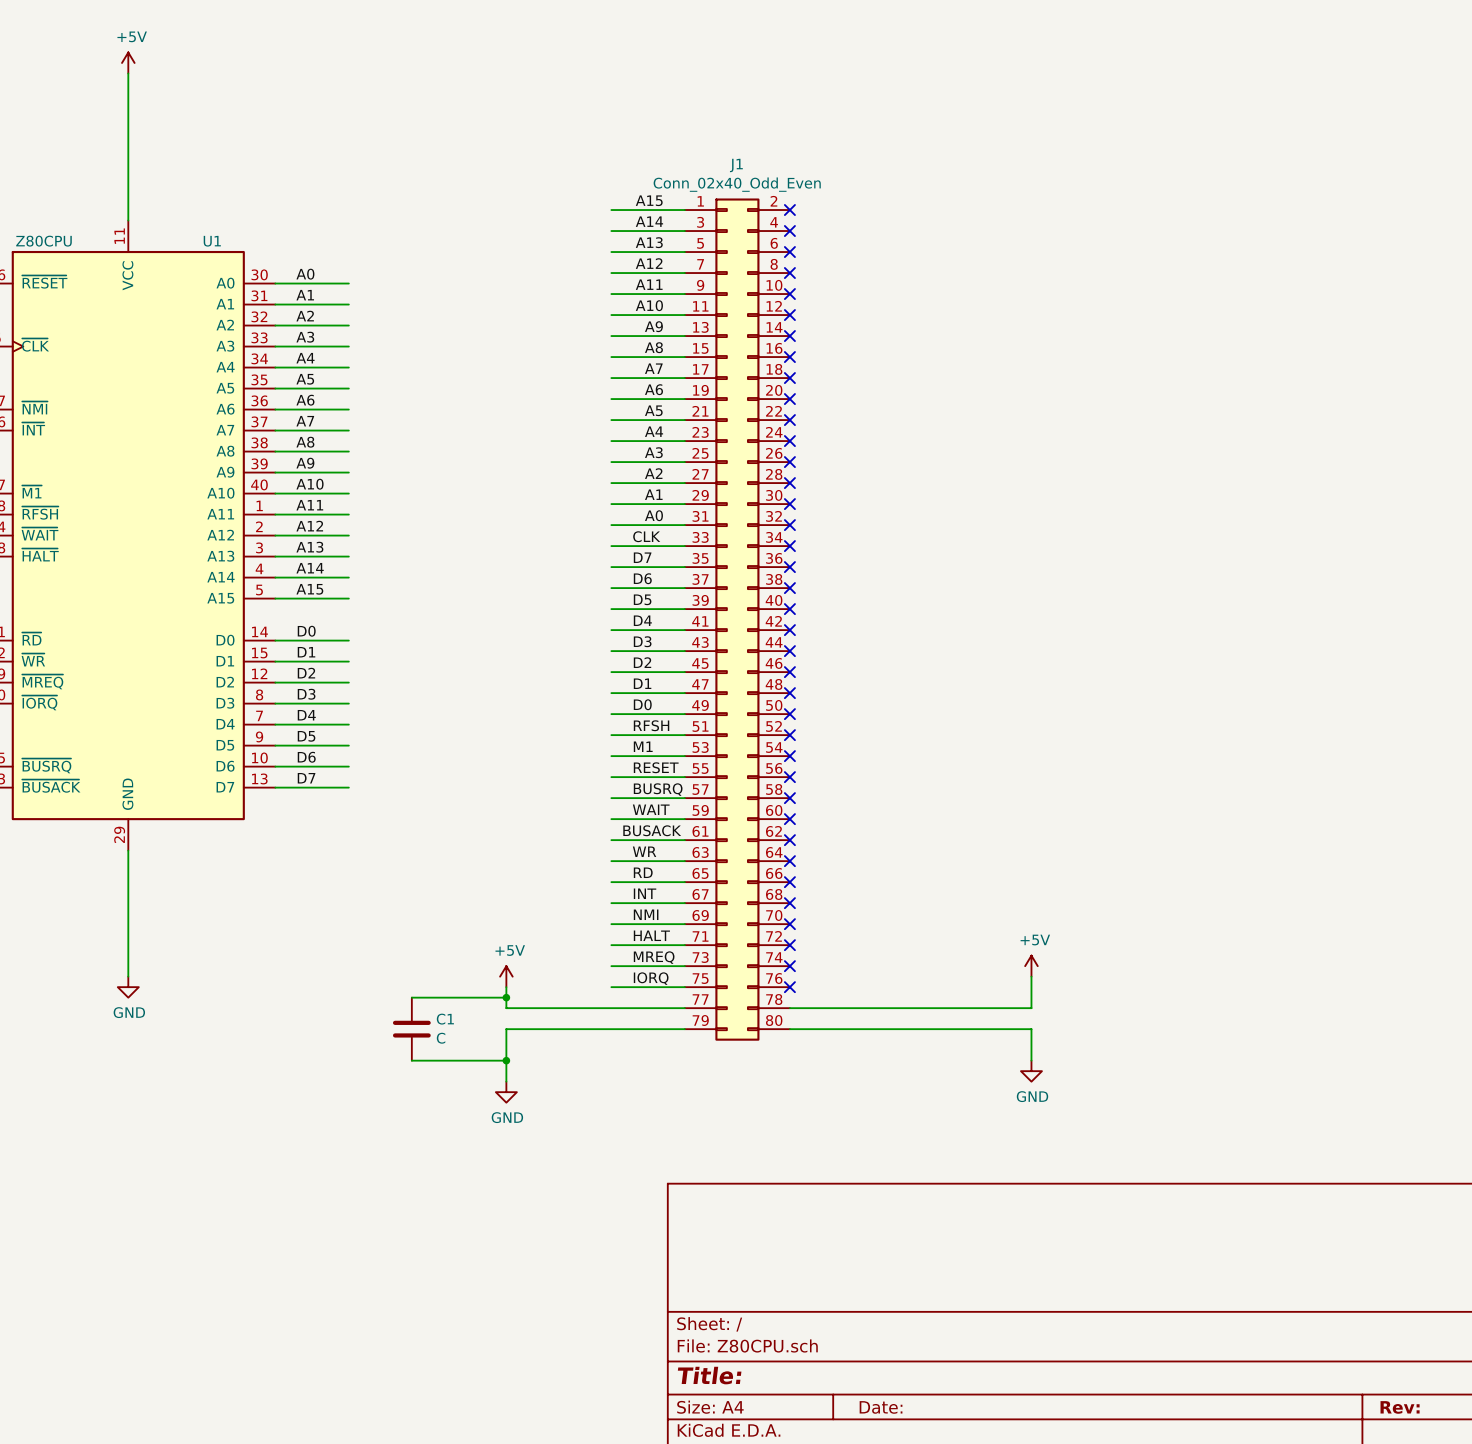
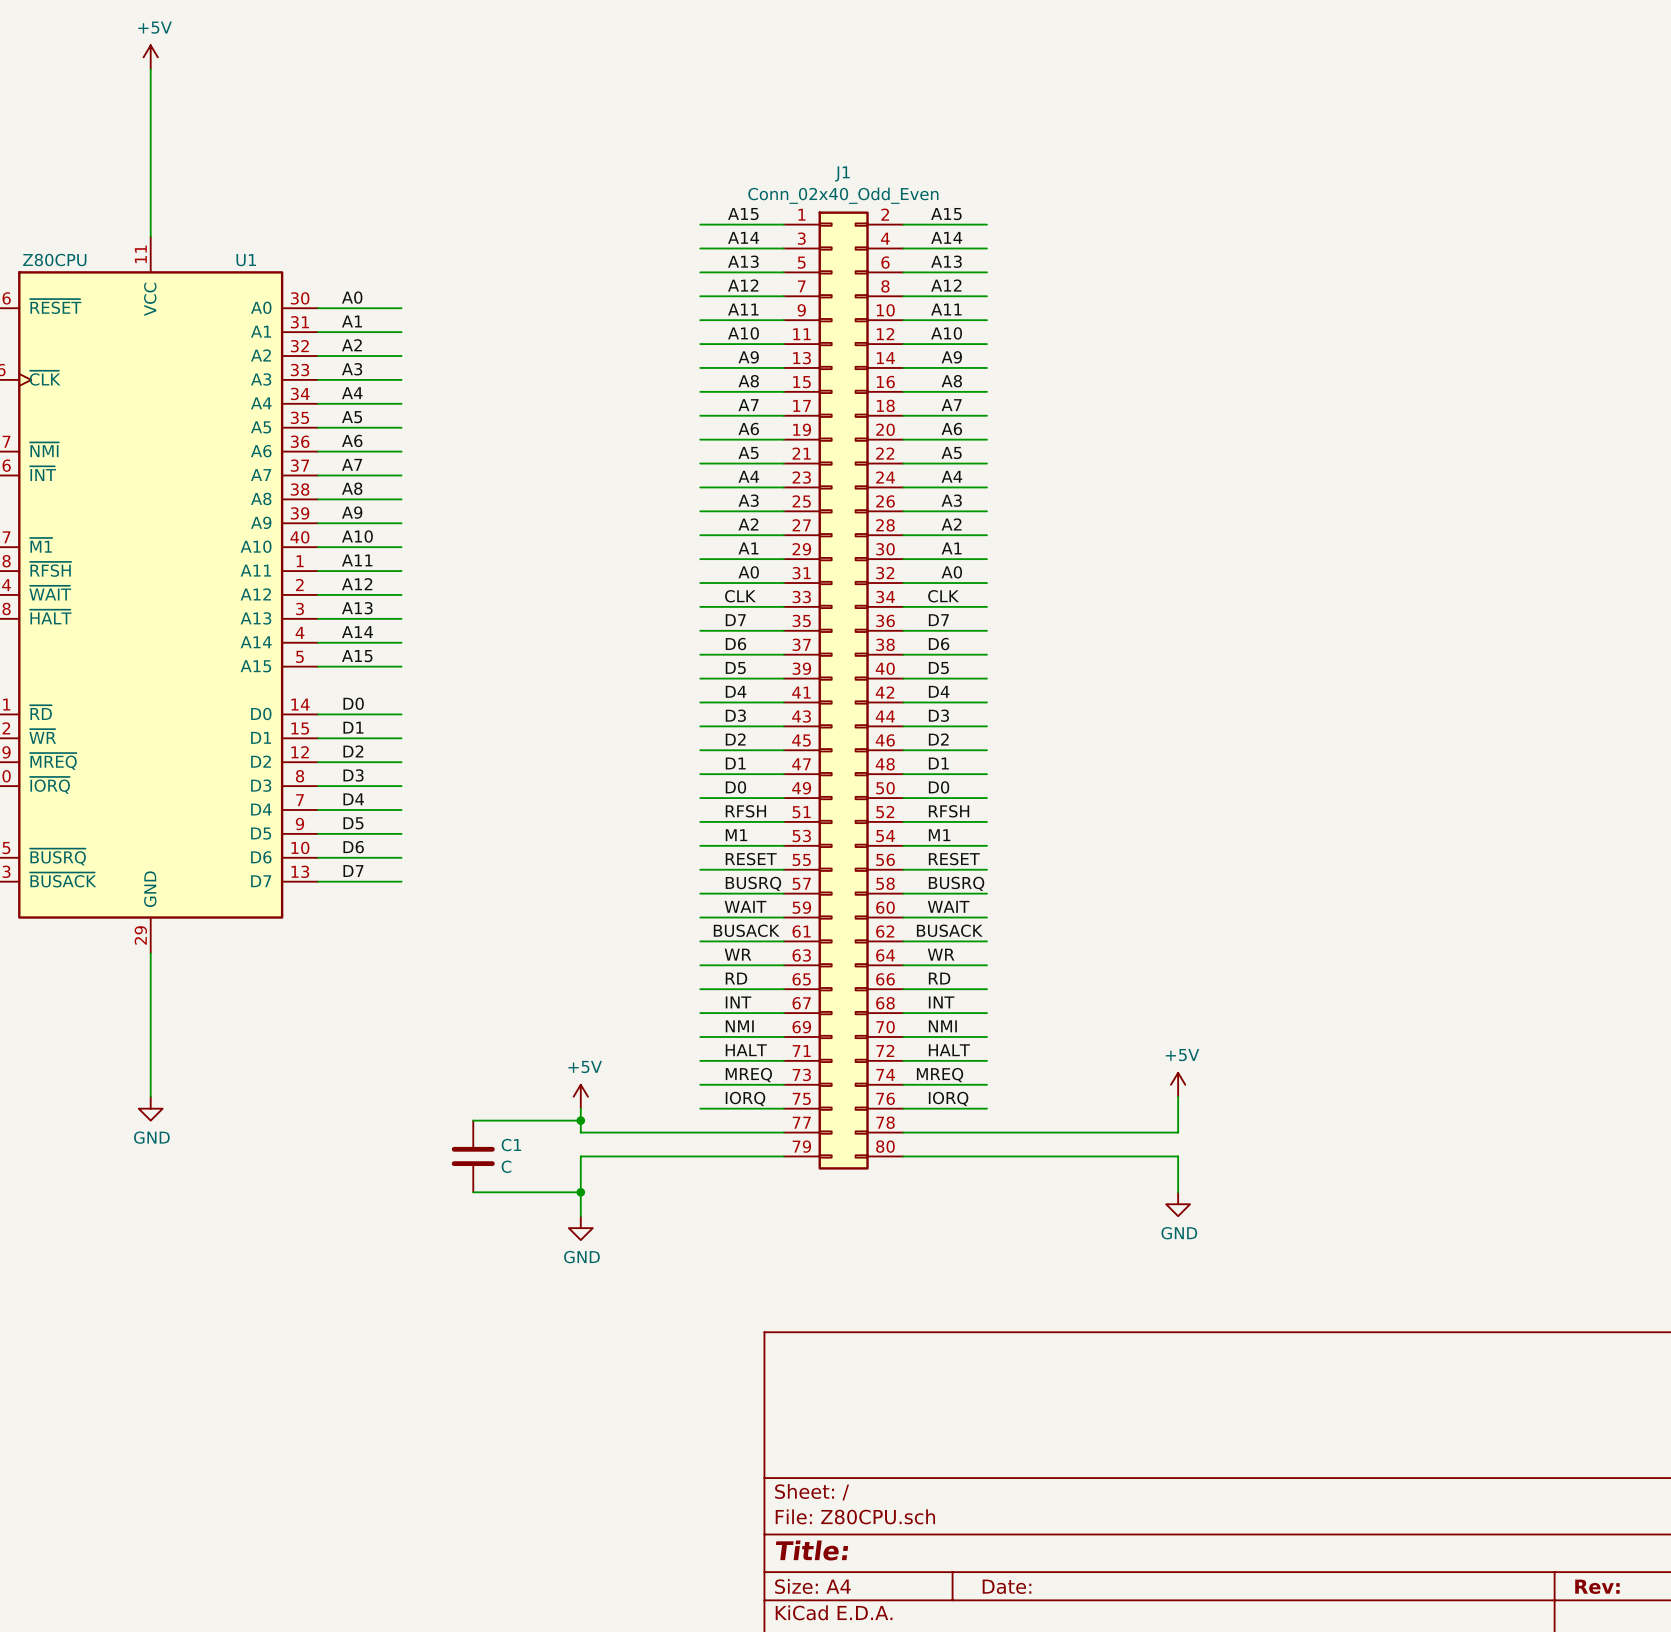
label: none -> A15 (946, 214)
wire: none -> (903, 224) (986, 224)
no-connect mark: (789, 210) -> none
label: none -> A14 (946, 237)
wire: none -> (903, 248) (986, 248)
no-connect mark: (789, 231) -> none
label: none -> A13 (946, 261)
wire: none -> (903, 272) (986, 272)
no-connect mark: (789, 252) -> none
label: none -> A12 (946, 285)
wire: none -> (903, 296) (986, 296)
no-connect mark: (789, 273) -> none
label: none -> A11 (946, 309)
wire: none -> (903, 320) (986, 320)
no-connect mark: (789, 294) -> none
label: none -> A10 (946, 333)
wire: none -> (903, 344) (986, 344)
no-connect mark: (789, 315) -> none
label: none -> A9 (951, 357)
wire: none -> (903, 367) (986, 367)
no-connect mark: (789, 336) -> none
label: none -> A8 (951, 381)
wire: none -> (903, 391) (986, 391)
no-connect mark: (789, 357) -> none
label: none -> A7 (951, 405)
wire: none -> (903, 415) (986, 415)
no-connect mark: (789, 378) -> none
label: none -> A6 (951, 429)
wire: none -> (903, 439) (986, 439)
no-connect mark: (789, 399) -> none
label: none -> A5 (951, 453)
wire: none -> (903, 463) (986, 463)
no-connect mark: (789, 420) -> none
label: none -> A4 (951, 476)
wire: none -> (903, 487) (986, 487)
no-connect mark: (789, 441) -> none
label: none -> A3 (951, 500)
wire: none -> (903, 511) (986, 511)
no-connect mark: (789, 462) -> none
label: none -> A2 (951, 524)
wire: none -> (903, 535) (986, 535)
no-connect mark: (789, 483) -> none
label: none -> A1 (951, 548)
wire: none -> (903, 559) (986, 559)
no-connect mark: (789, 504) -> none
label: none -> A0 (951, 572)
wire: none -> (903, 583) (986, 583)
no-connect mark: (789, 525) -> none
label: none -> CLK (943, 596)
wire: none -> (903, 606) (986, 606)
no-connect mark: (789, 546) -> none
label: none -> D7 (938, 620)
wire: none -> (903, 630) (986, 630)
no-connect mark: (789, 567) -> none
label: none -> D6 (939, 644)
wire: none -> (903, 654) (986, 654)
no-connect mark: (789, 588) -> none
label: none -> D5 (938, 668)
wire: none -> (903, 678) (986, 678)
no-connect mark: (789, 609) -> none
label: none -> D4 (939, 691)
wire: none -> (903, 702) (986, 702)
no-connect mark: (789, 630) -> none
label: none -> D3 (938, 715)
wire: none -> (903, 726) (986, 726)
no-connect mark: (789, 651) -> none
label: none -> D2 (938, 739)
wire: none -> (903, 750) (986, 750)
no-connect mark: (789, 672) -> none
label: none -> D1 (938, 763)
wire: none -> (903, 774) (986, 774)
no-connect mark: (789, 693) -> none
label: none -> D0 (939, 787)
wire: none -> (903, 798) (986, 798)
no-connect mark: (789, 714) -> none
label: none -> RFSH (949, 811)
wire: none -> (903, 821) (986, 821)
no-connect mark: (789, 735) -> none
label: none -> M1 (939, 835)
wire: none -> (903, 845) (986, 845)
no-connect mark: (789, 756) -> none
label: none -> RESET (954, 859)
wire: none -> (903, 869) (986, 869)
no-connect mark: (789, 777) -> none
label: none -> BUSRQ (956, 883)
wire: none -> (903, 893) (986, 893)
no-connect mark: (789, 798) -> none
label: none -> WAIT (948, 906)
wire: none -> (903, 917) (986, 917)
no-connect mark: (789, 819) -> none
label: none -> BUSACK (949, 930)
wire: none -> (903, 941) (986, 941)
no-connect mark: (789, 840) -> none
label: none -> WR (941, 954)
wire: none -> (903, 965) (986, 965)
no-connect mark: (789, 861) -> none
label: none -> RD (939, 978)
wire: none -> (903, 989) (986, 989)
no-connect mark: (789, 882) -> none
label: none -> INT (941, 1002)
wire: none -> (903, 1013) (986, 1013)
no-connect mark: (789, 903) -> none
label: none -> NMI (942, 1026)
wire: none -> (903, 1036) (986, 1036)
no-connect mark: (789, 924) -> none
label: none -> HALT (949, 1050)
wire: none -> (903, 1060) (986, 1060)
no-connect mark: (789, 945) -> none
label: none -> MREQ (940, 1075)
wire: none -> (903, 1084) (986, 1084)
no-connect mark: (789, 966) -> none
label: none -> IORQ (948, 1098)
wire: none -> (903, 1108) (986, 1108)
no-connect mark: (789, 987) -> none

